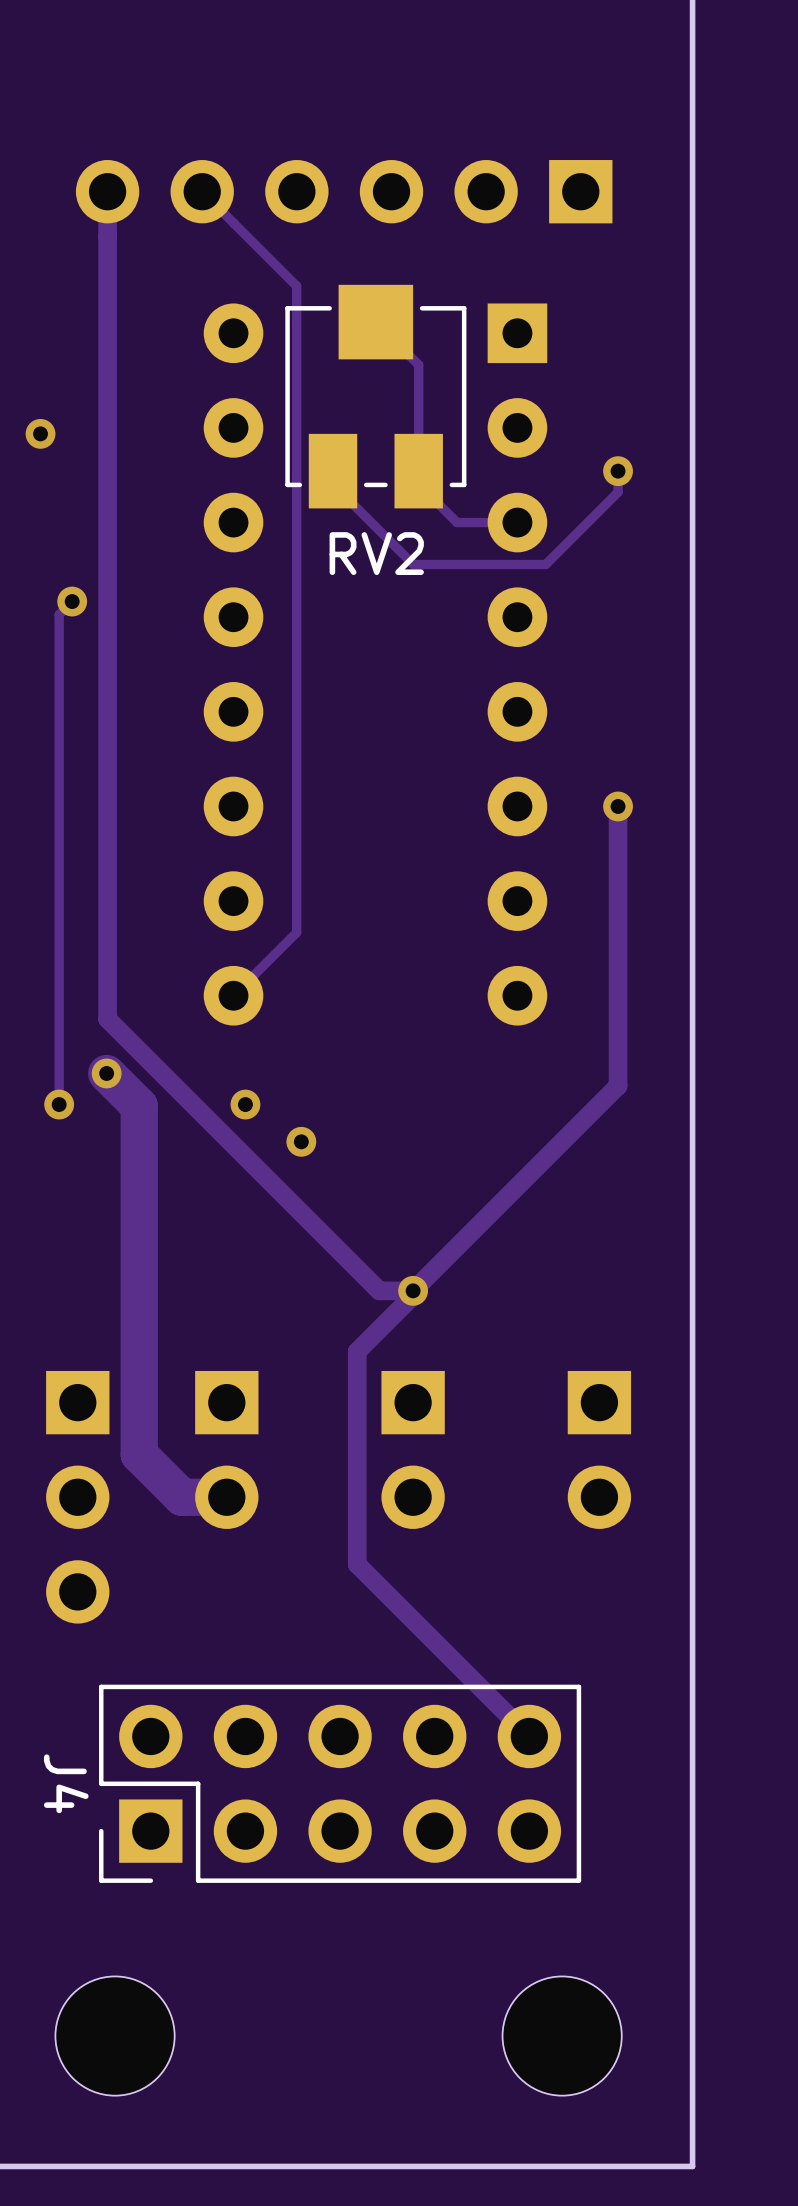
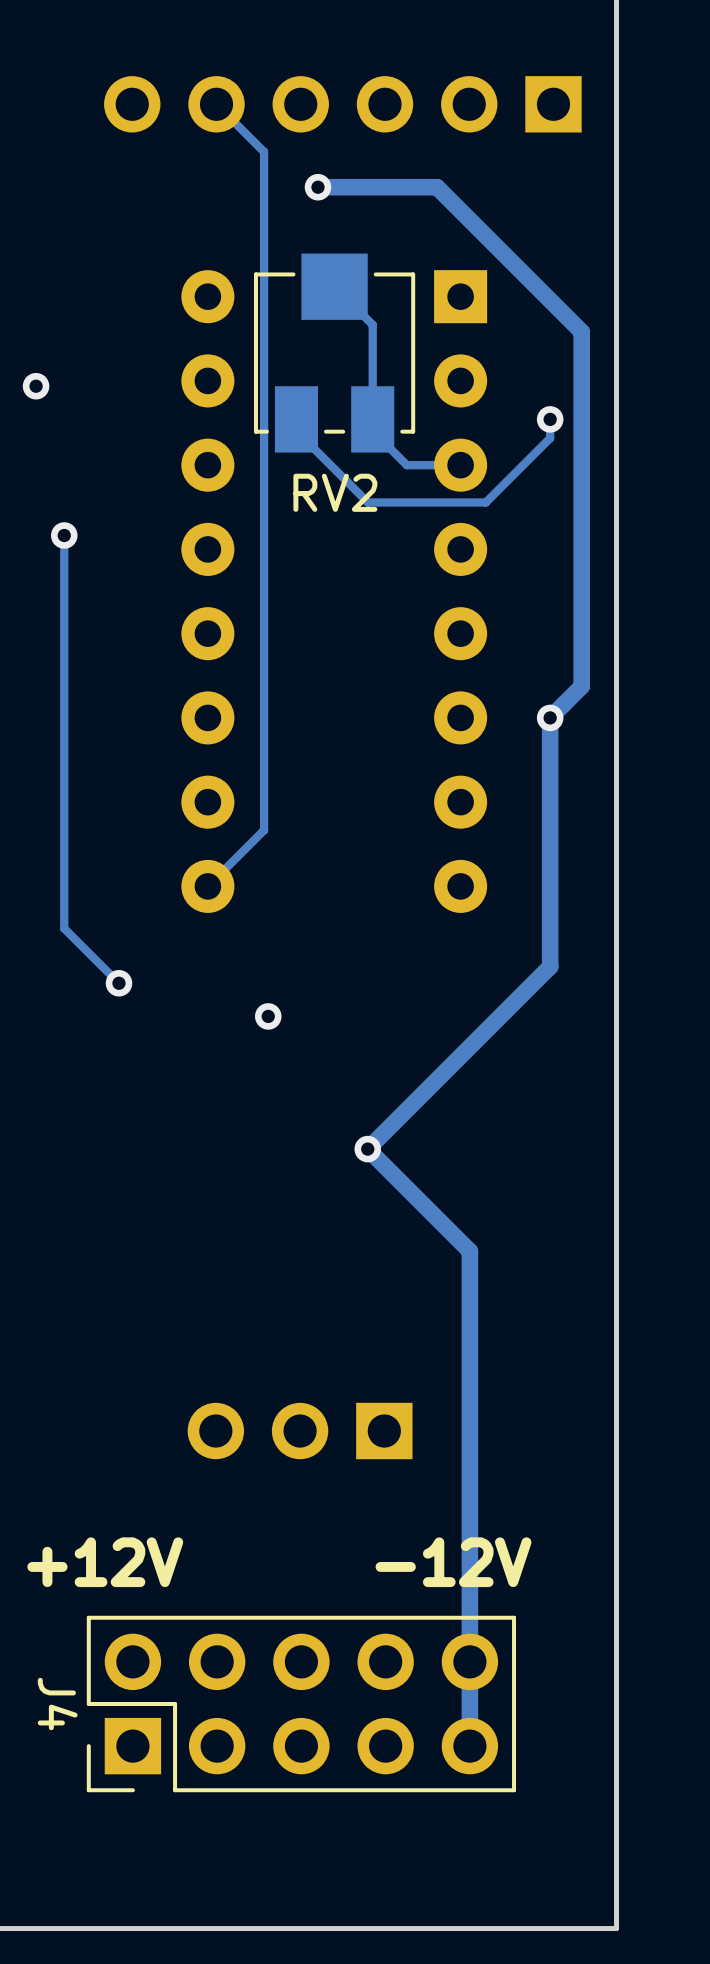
track: (107, 191) (107, 1019) (379, 1290) (413, 1290) (413, 1295) (357, 1351) (357, 1564) (529, 1736) -> none
track: (202, 191) (296, 286) -> (216, 104) (264, 151) (264, 254)
part position: (344, 191) -> (342, 104)
track: none -> (318, 187) (437, 187) (581, 331) (581, 686) (550, 717)
via: none -> (318, 187)
track: (72, 601) (59, 614) (59, 1104) -> (64, 535) (64, 928) (118, 983)
track: (106, 1073) (139, 1106) (139, 1454) (182, 1497) (226, 1497) -> none
via: (106, 1073) -> none
via: (59, 1104) -> none
via: none -> (118, 983)
via: (245, 1104) -> none
track: none -> (367, 1149) (469, 1251) (469, 1746)
part: (226, 1449) -> none
part: (413, 1449) -> none
part: (599, 1449) -> none
part rotation: 0° (77, 1497) -> 90° clockwise (300, 1431)
part position: (77, 1497) -> (300, 1431)
text: none -> +12V (105, 1562)
text: none -> -12V (453, 1562)
J4 position: (340, 1783) -> (301, 1703)
part: (115, 2036) -> none
part: (562, 2036) -> none

